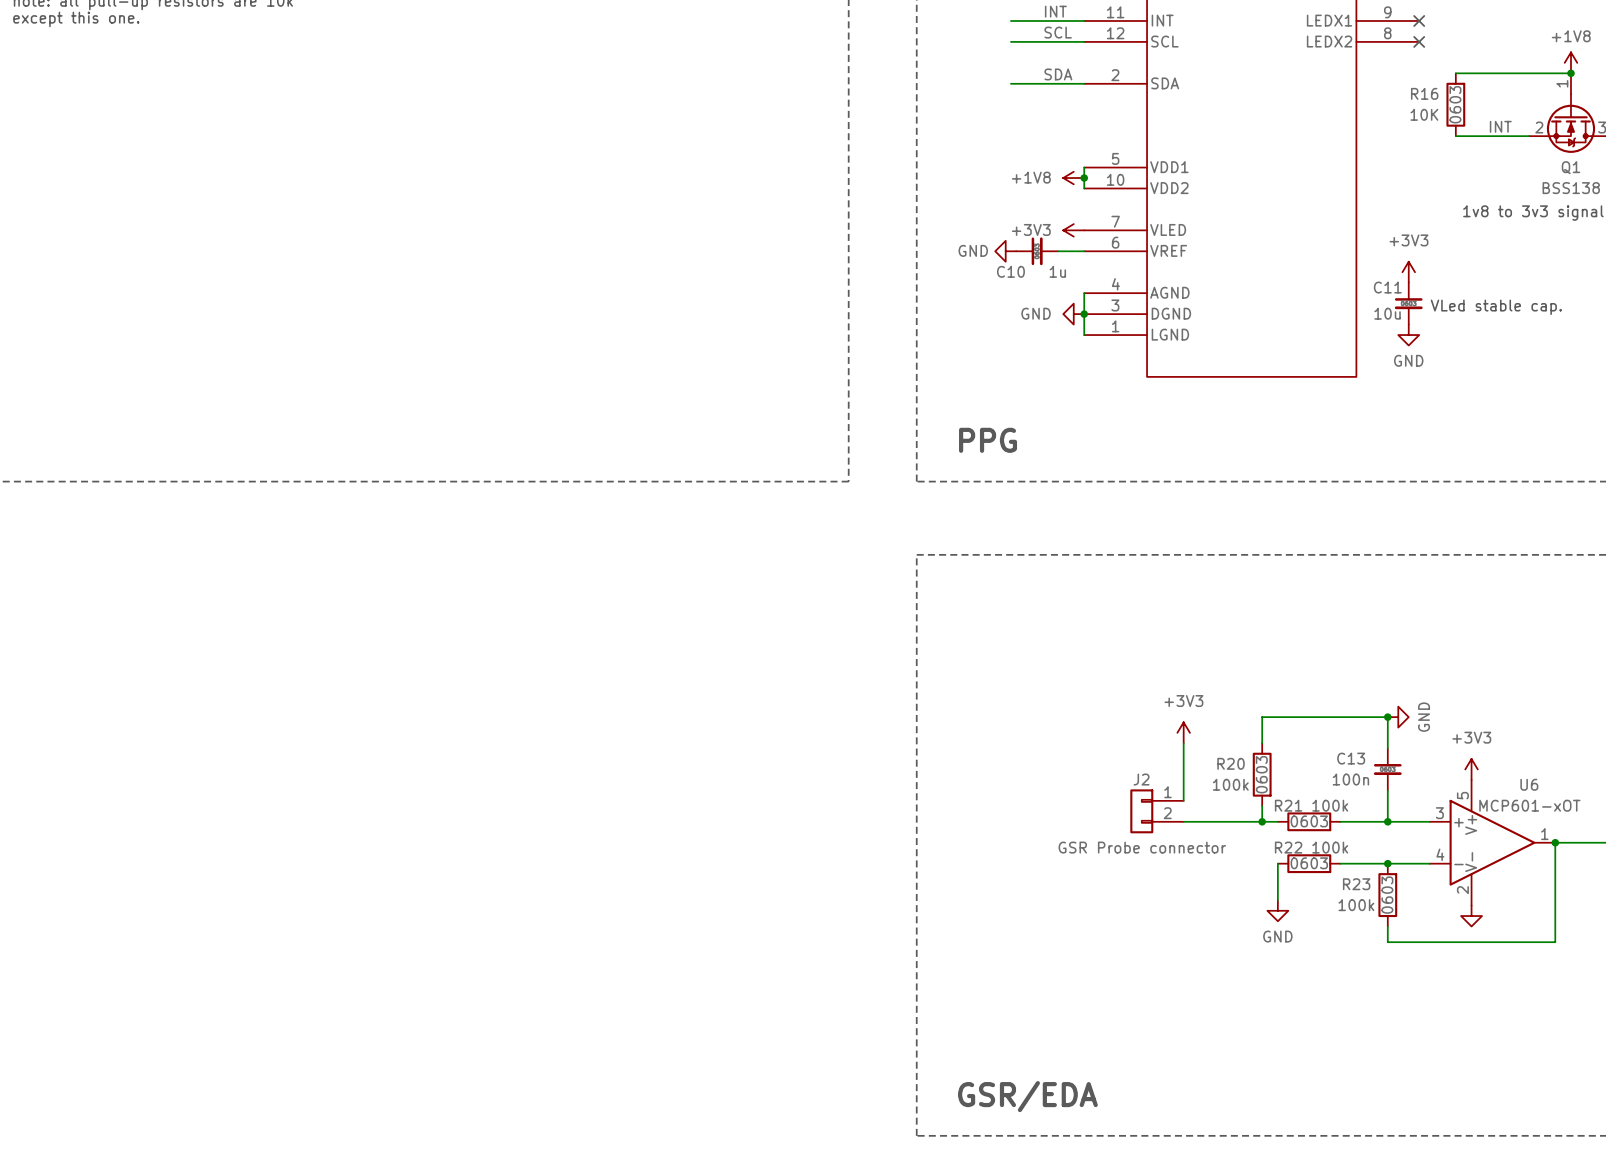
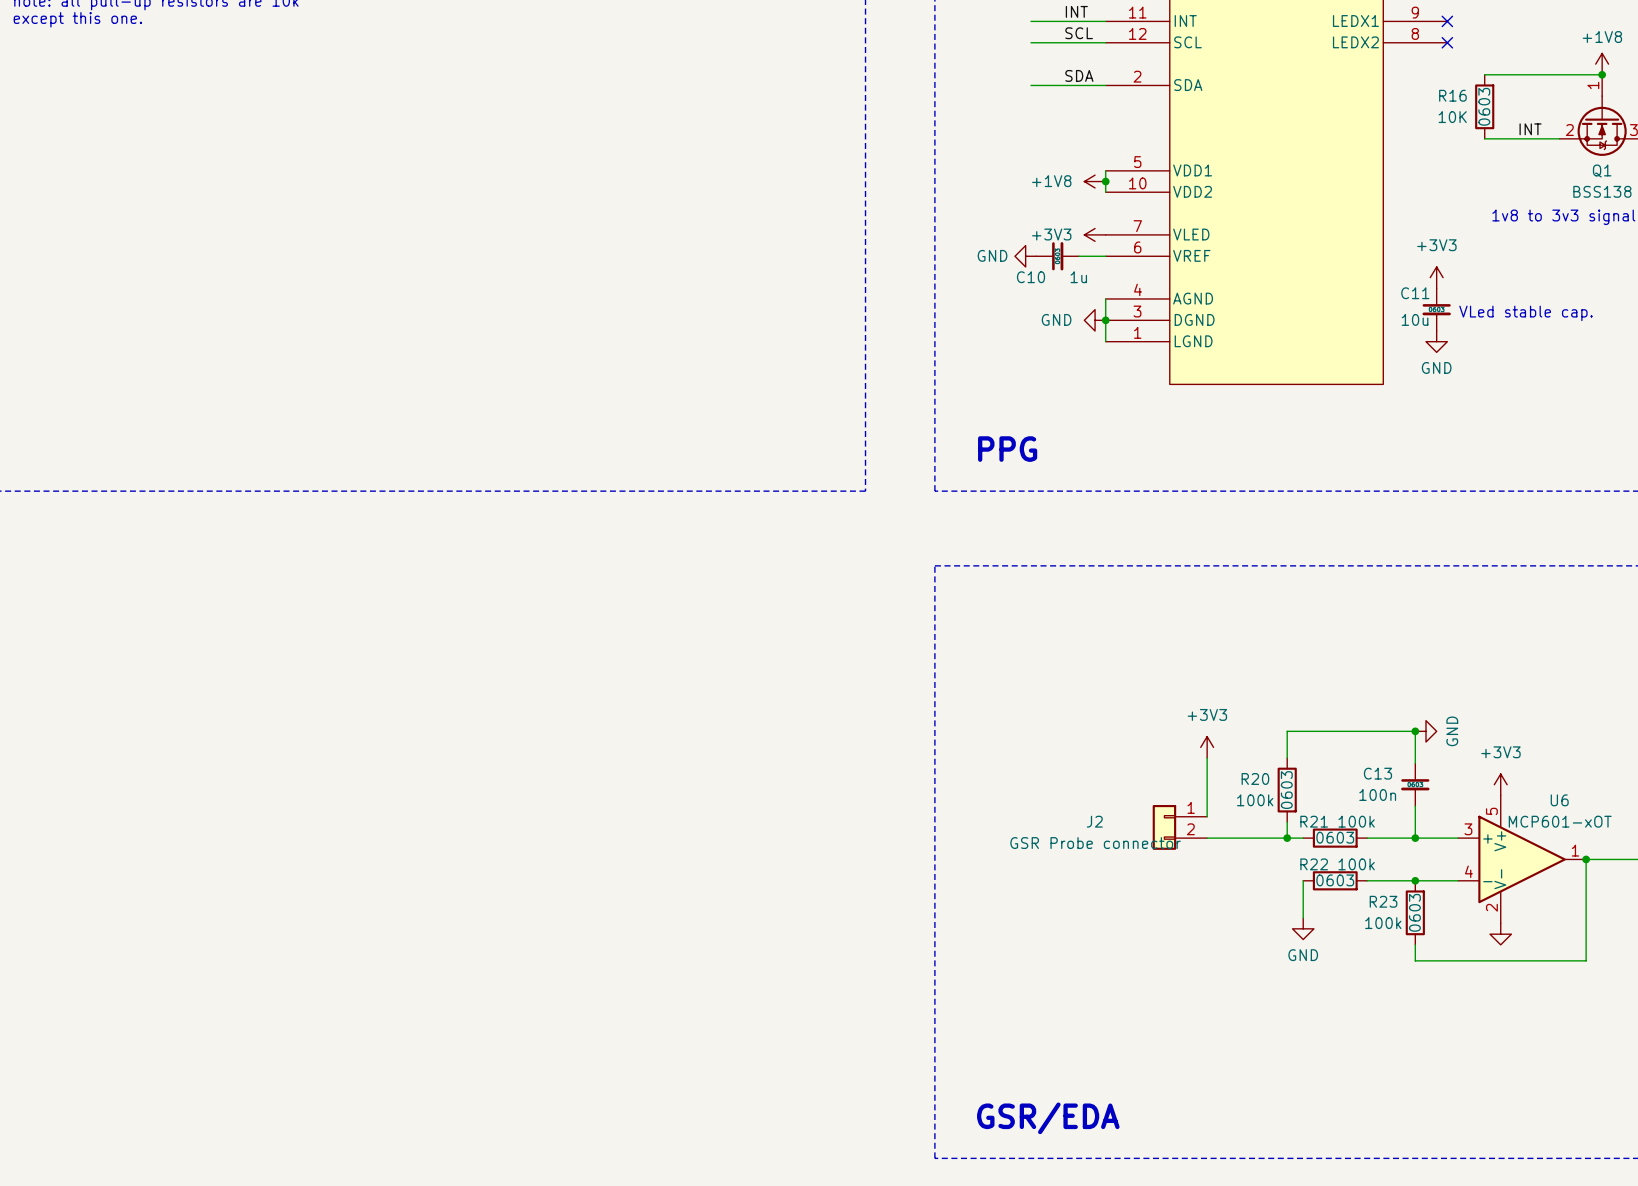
J2 name position: J2 (1141, 779) -> J2 (1094, 821)
J2 value position: GSR Probe connector (1142, 847) -> GSR Probe connector (1095, 843)

